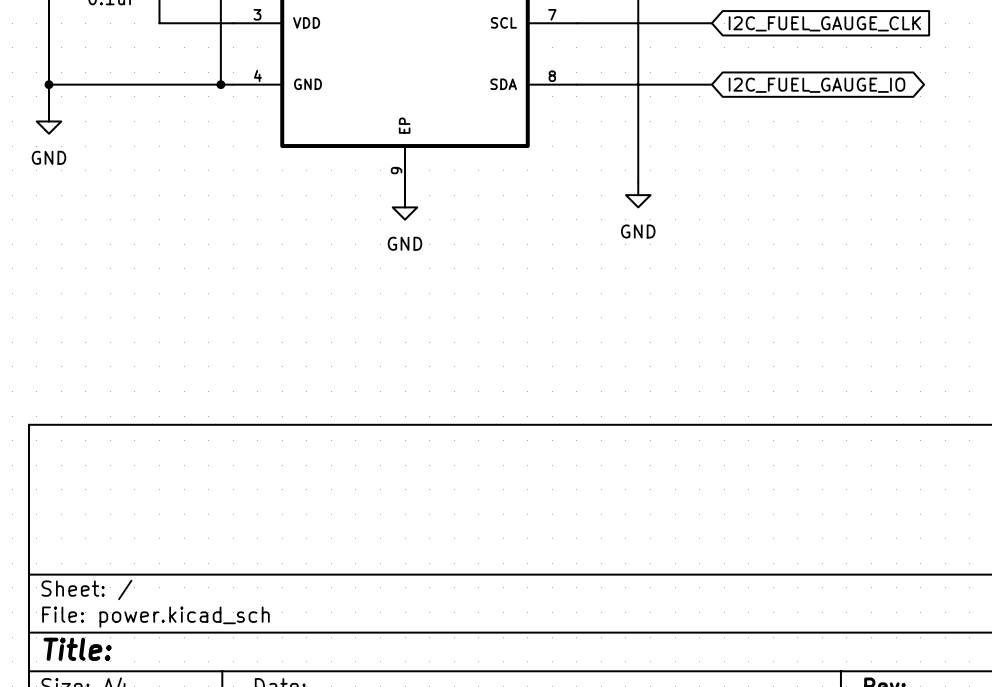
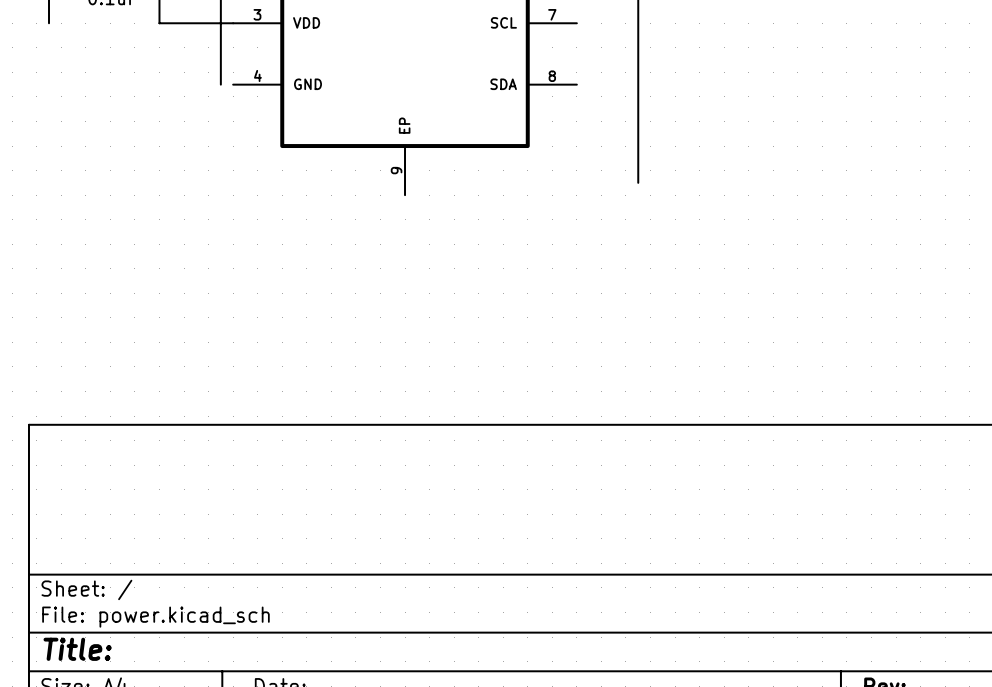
wire: (49, 23) (49, 109) -> none
wire: (576, 23) (711, 23) -> none
global label: I2C_FUEL_GAUGE_CLK (824, 23) -> none
wire: (49, 84) (233, 84) -> none
junction: (49, 84) -> none
junction: (220, 84) -> none
wire: (576, 84) (711, 84) -> none
global label: I2C_FUEL_GAUGE_IO (817, 85) -> none
power symbol: GND (49, 121) -> none
power symbol: GND (638, 195) -> none
power symbol: GND (405, 207) -> none

